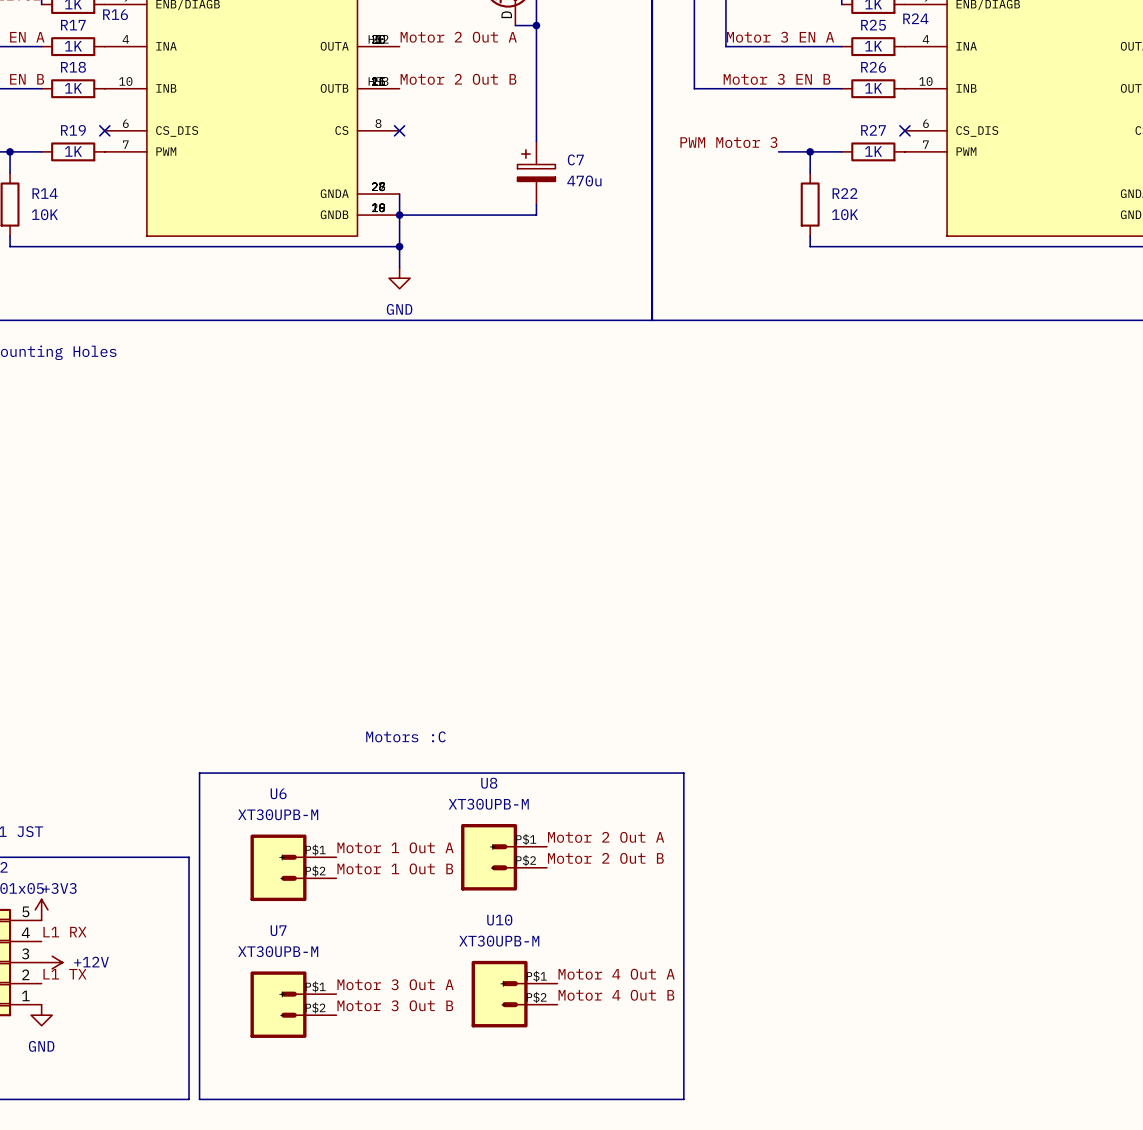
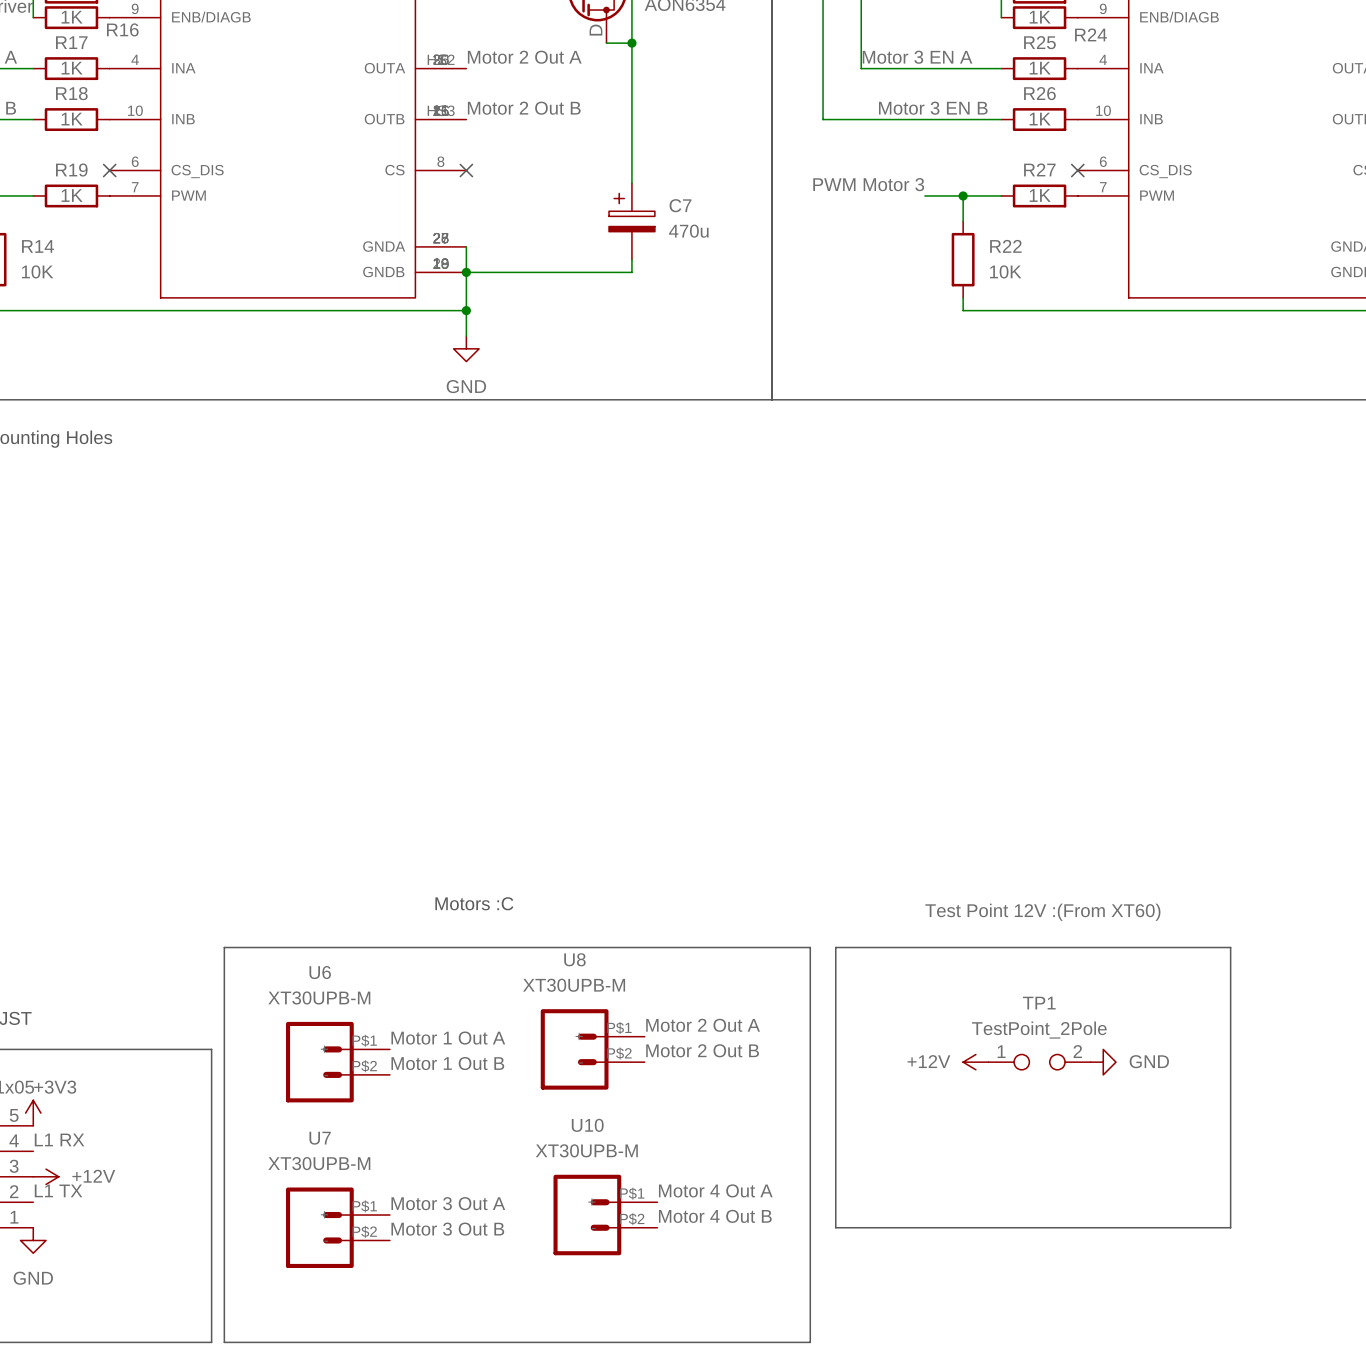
label: none -> Test Point 12V :(From XT60) (1042, 912)
line: none -> (835, 947) (1230, 947) (1230, 1227) (835, 1227) (835, 947)
power symbol: none -> +12V (975, 1062)
TP1: none -> TestPoint_2Pole (1039, 1062)
power symbol: none -> GND (1103, 1062)

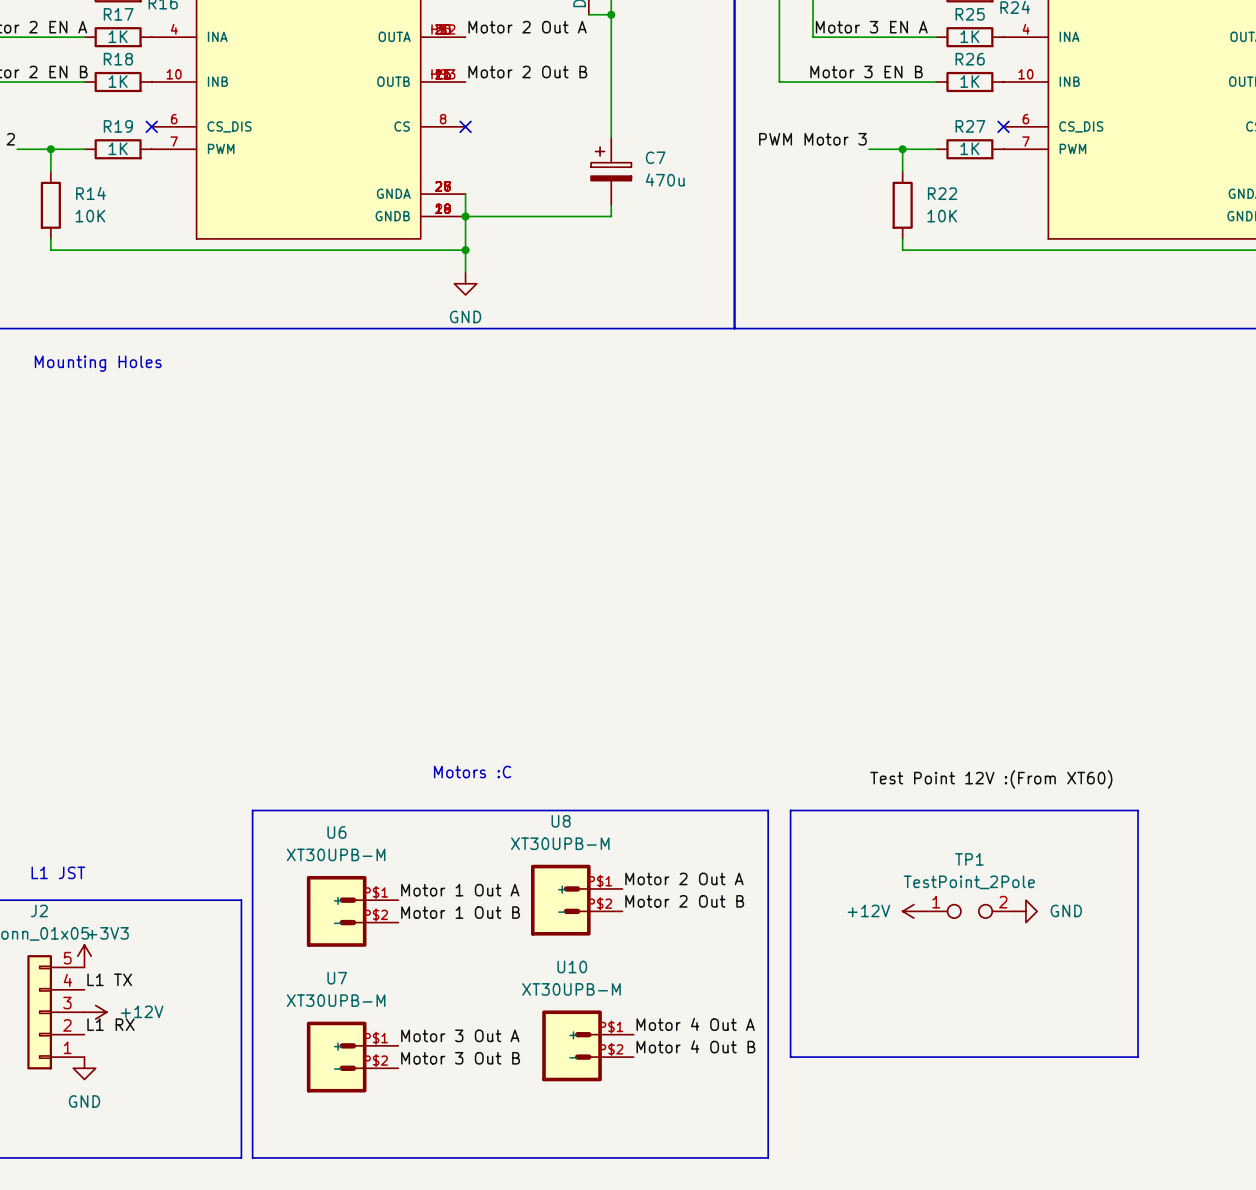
label: L1 RX (59, 1139) -> L1 TX (109, 979)
label: L1 TX (58, 1190) -> L1 RX (110, 1024)

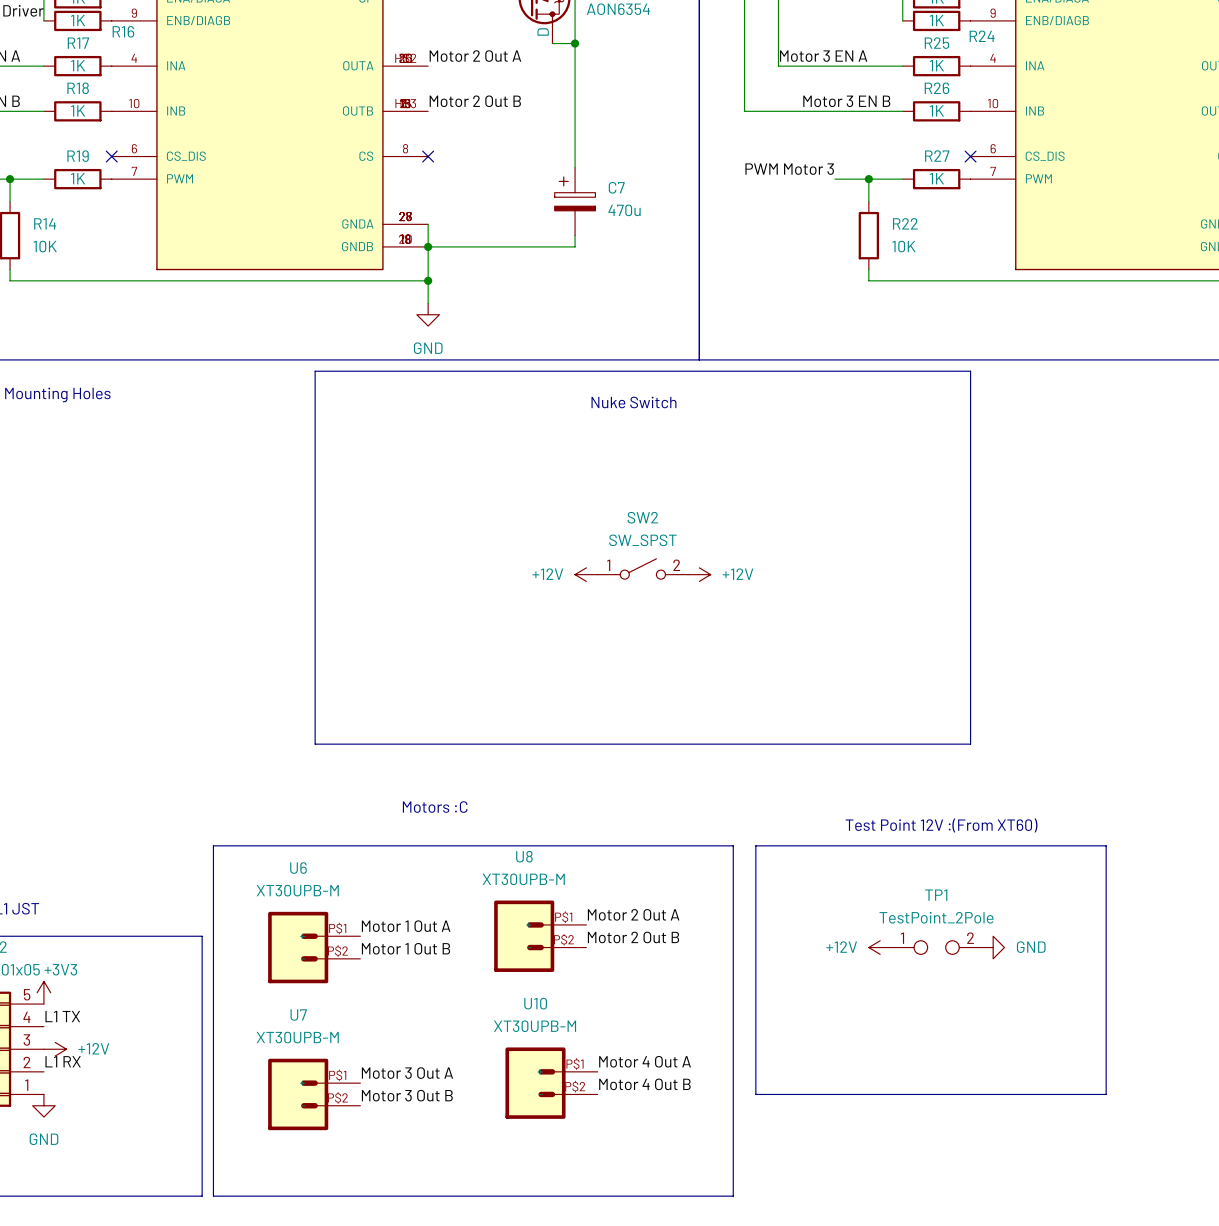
line: none -> (315, 371) (970, 371) (970, 744) (315, 744) (315, 371)
text: none -> Nuke Switch (633, 402)
SW2: none -> SW_SPST (642, 568)
power symbol: none -> +12V (586, 574)
power symbol: none -> +12V (699, 574)
label: Test Point 12V :(From XT60) (991, 779) -> none
text: none -> Test Point 12V :(From XT60) (941, 825)

